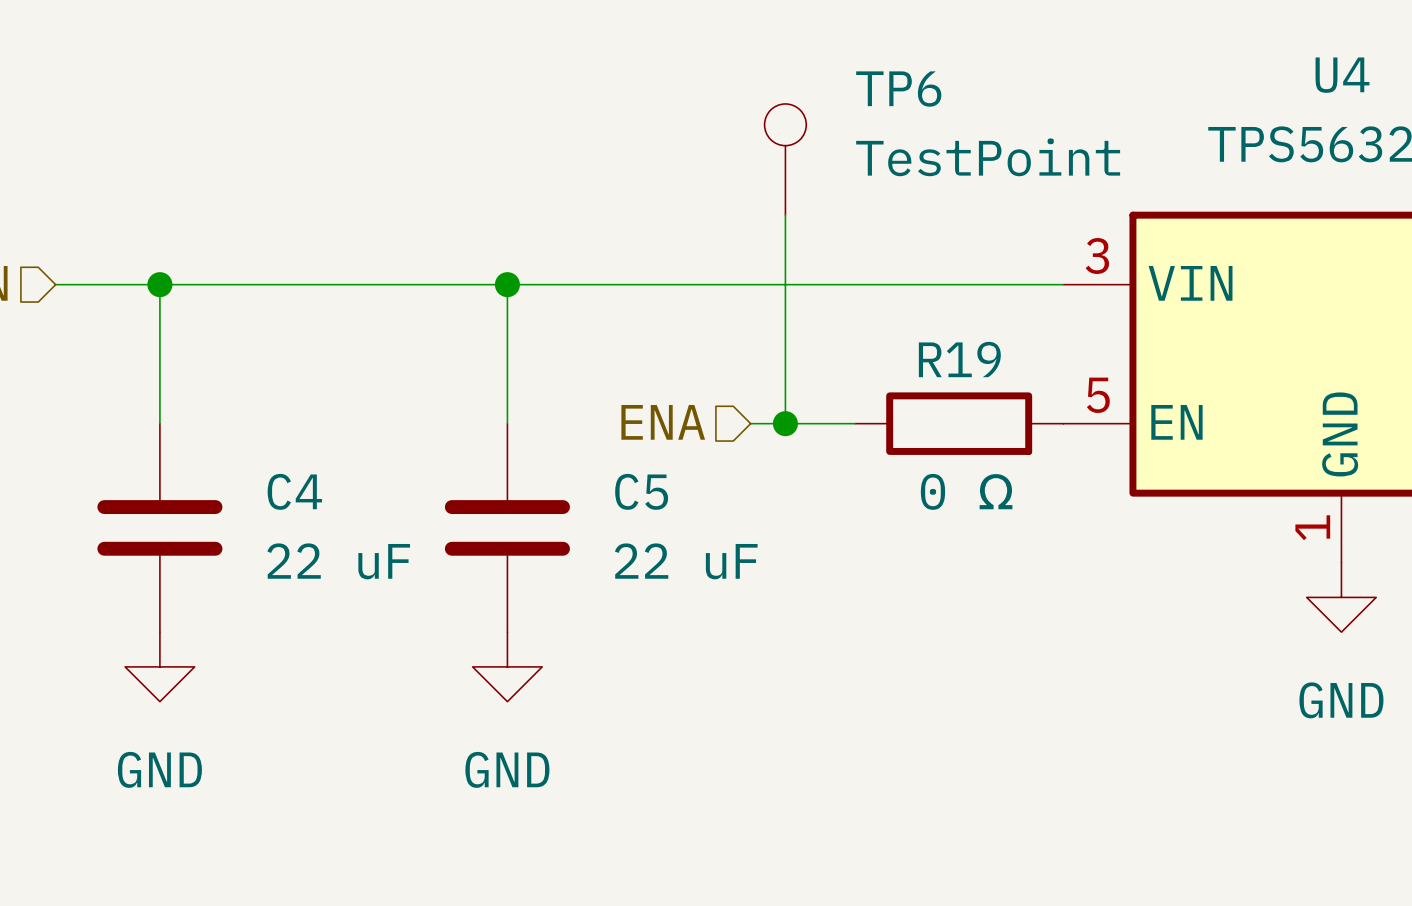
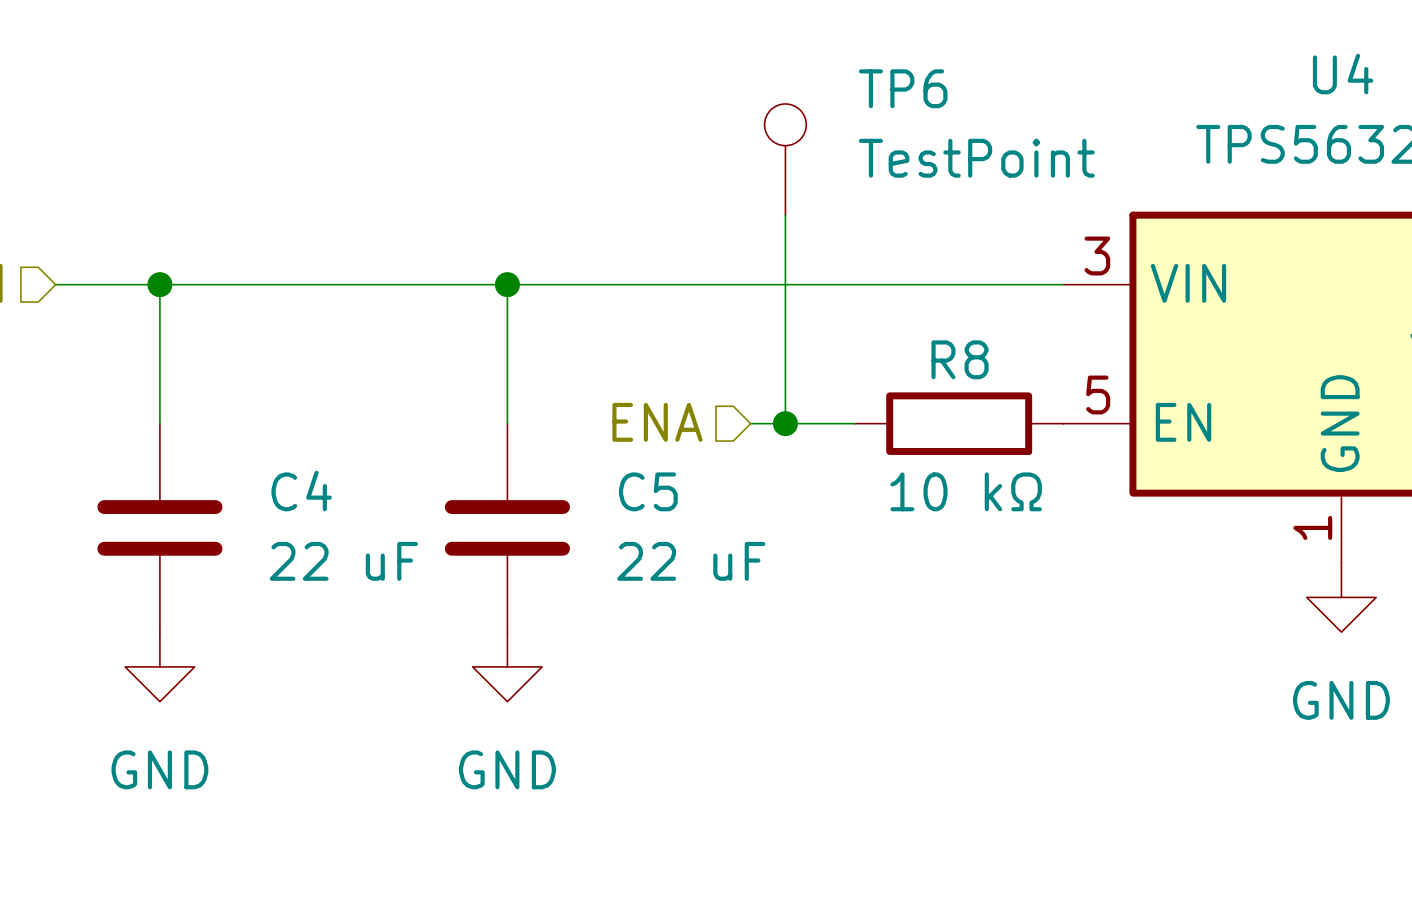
R19 name: R19 (959, 359) -> R8 (960, 359)
R19 value: 0 Ω (966, 491) -> 10 kΩ (966, 491)

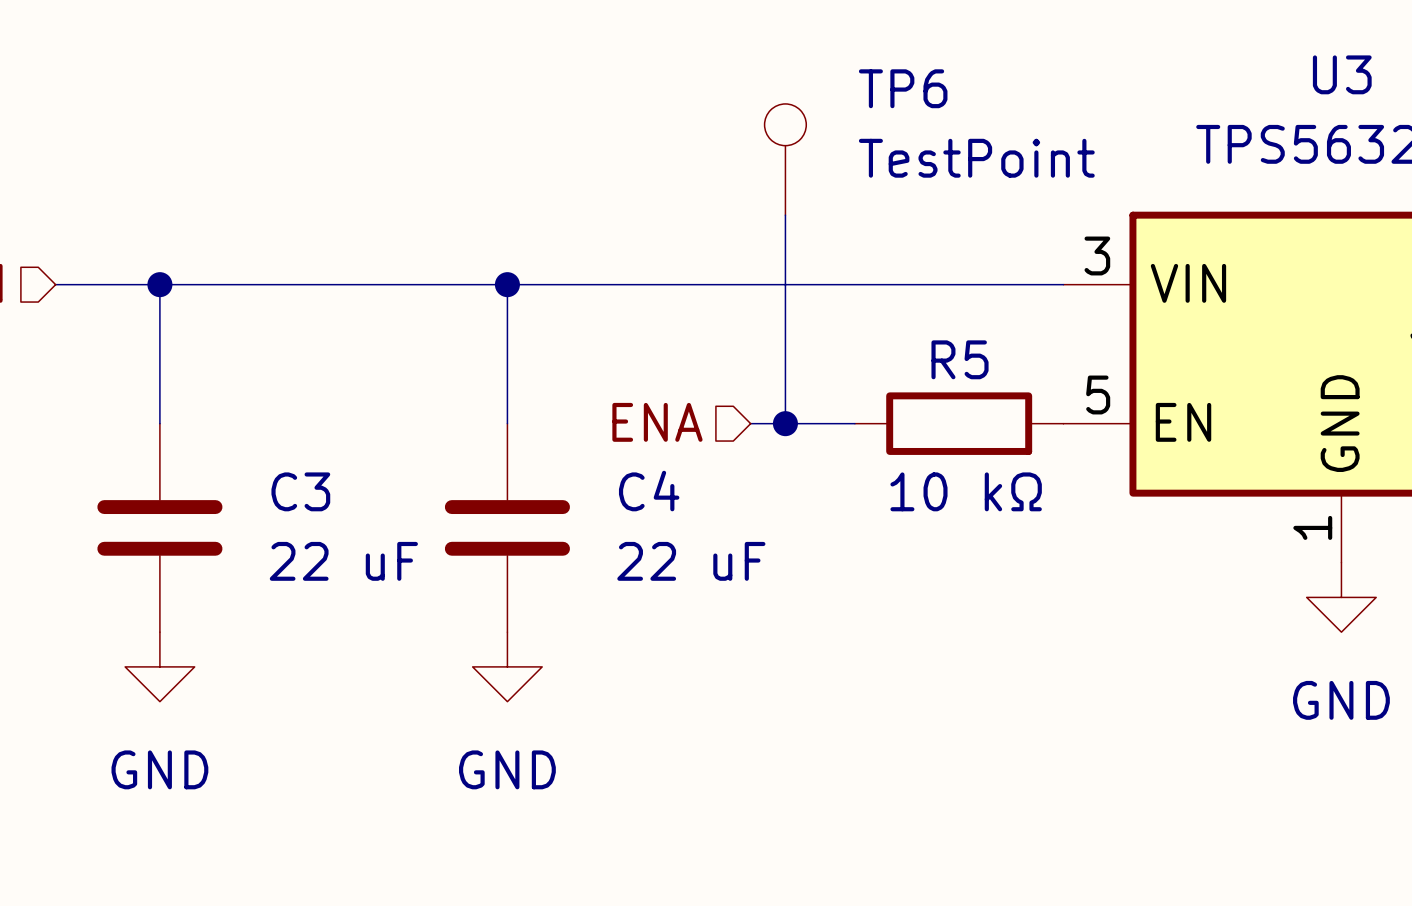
U4 name: U4 (1343, 74) -> U3 (1342, 74)
R8 name: R8 (960, 359) -> R5 (960, 359)
C4 name: C4 (301, 491) -> C3 (300, 491)
C5 name: C5 (648, 491) -> C4 (649, 491)

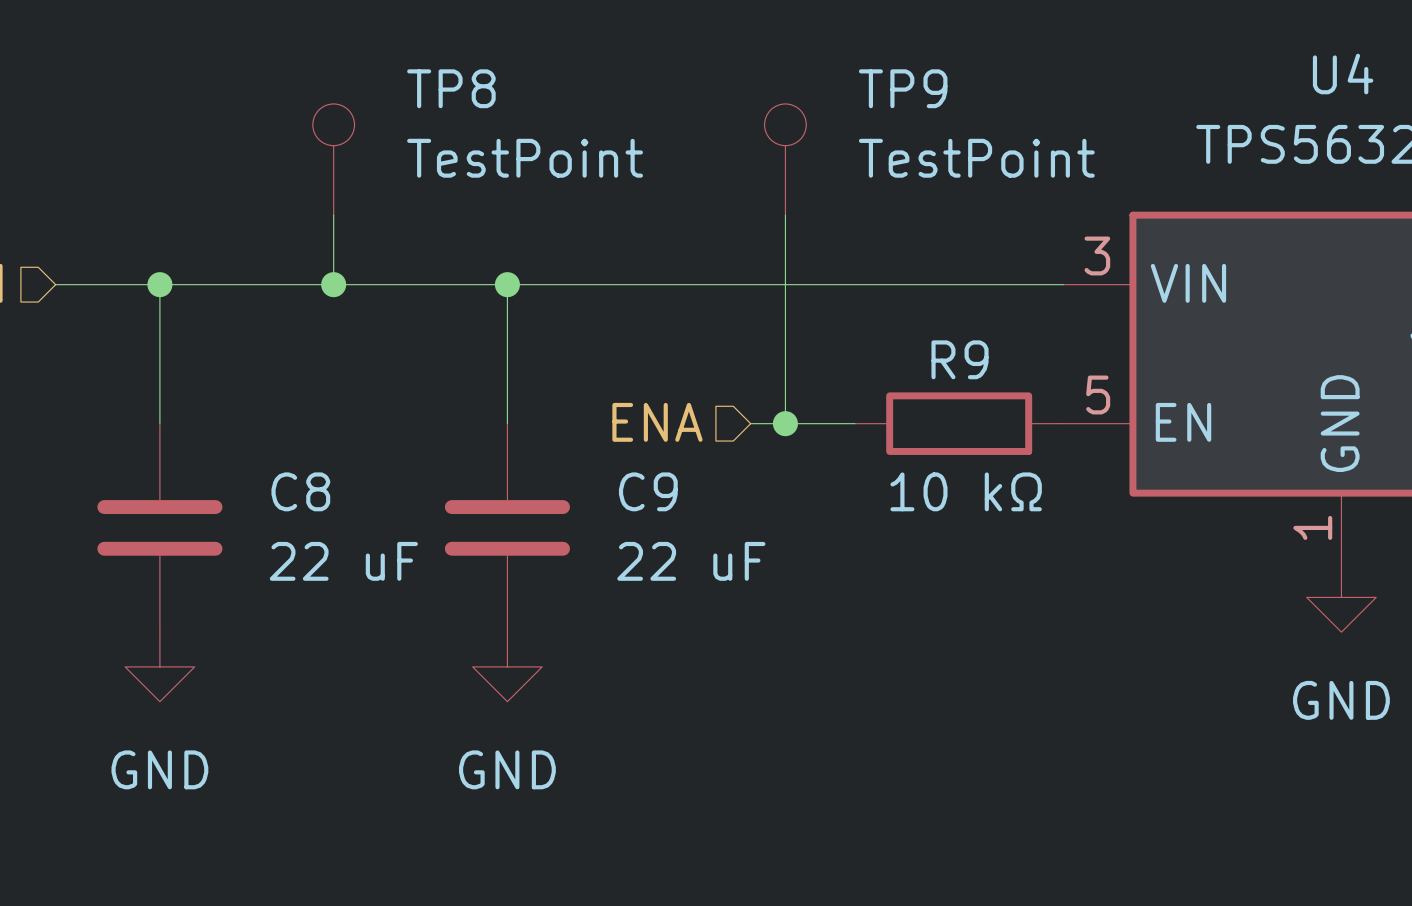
U3 name: U3 (1342, 74) -> U4 (1343, 74)
TP6 name: TP6 (903, 88) -> TP9 (903, 88)
TP8: none -> TestPoint (333, 159)
wire: none -> (333, 215) (333, 284)
junction: none -> (333, 284)
R5 name: R5 (960, 359) -> R9 (960, 359)
C3 name: C3 (300, 491) -> C8 (300, 491)
C4 name: C4 (649, 491) -> C9 (648, 491)

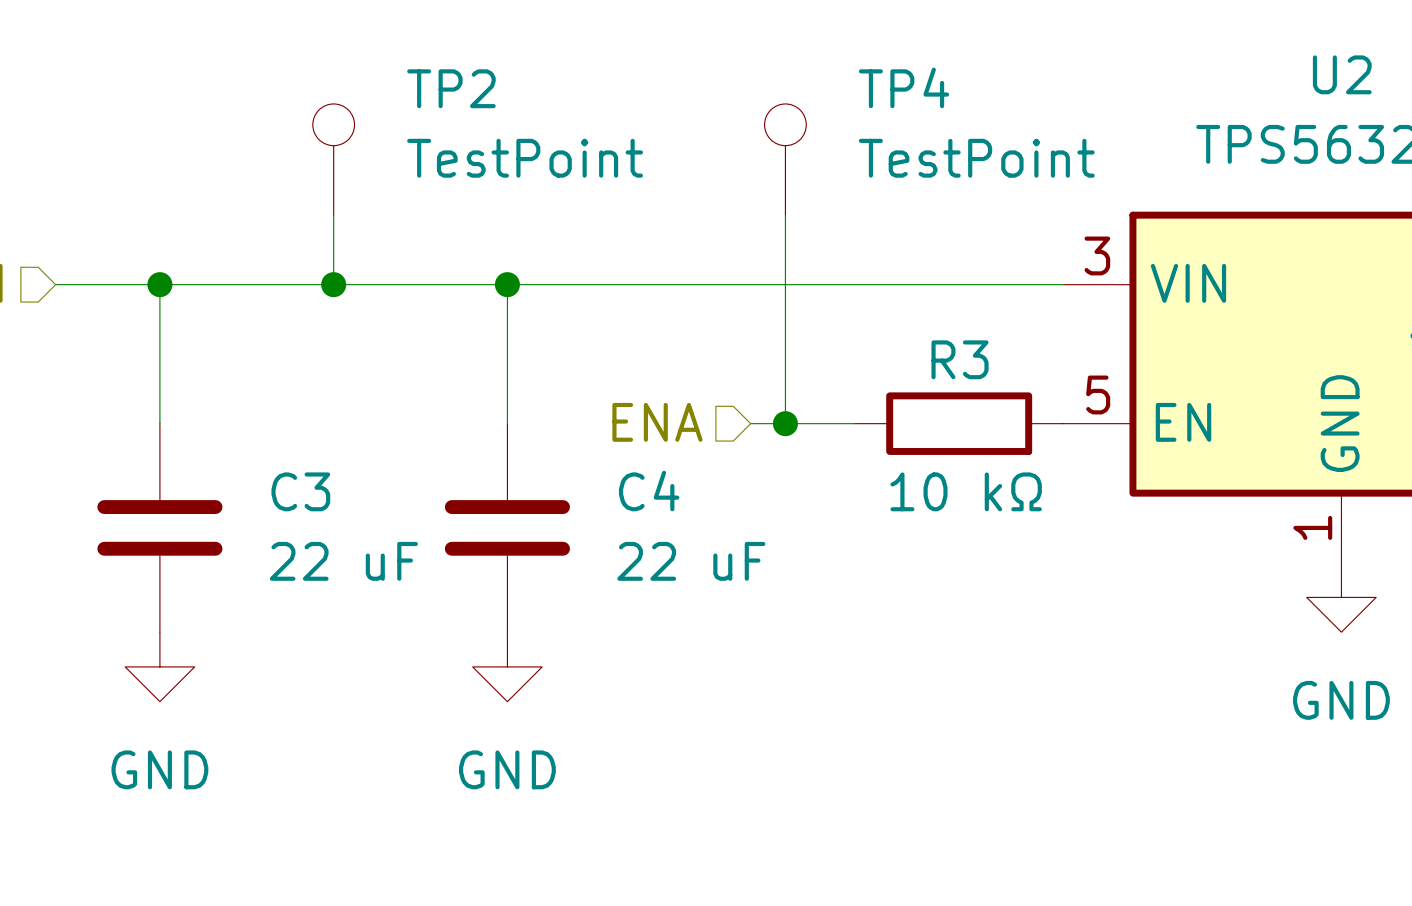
U4 name: U4 (1343, 74) -> U2 (1342, 74)
TP8 name: TP8 (451, 88) -> TP2 (451, 88)
TP9 name: TP9 (903, 88) -> TP4 (904, 87)
R9 name: R9 (960, 359) -> R3 (960, 359)
C8 name: C8 (300, 491) -> C3 (300, 491)
C9 name: C9 (648, 491) -> C4 (649, 491)

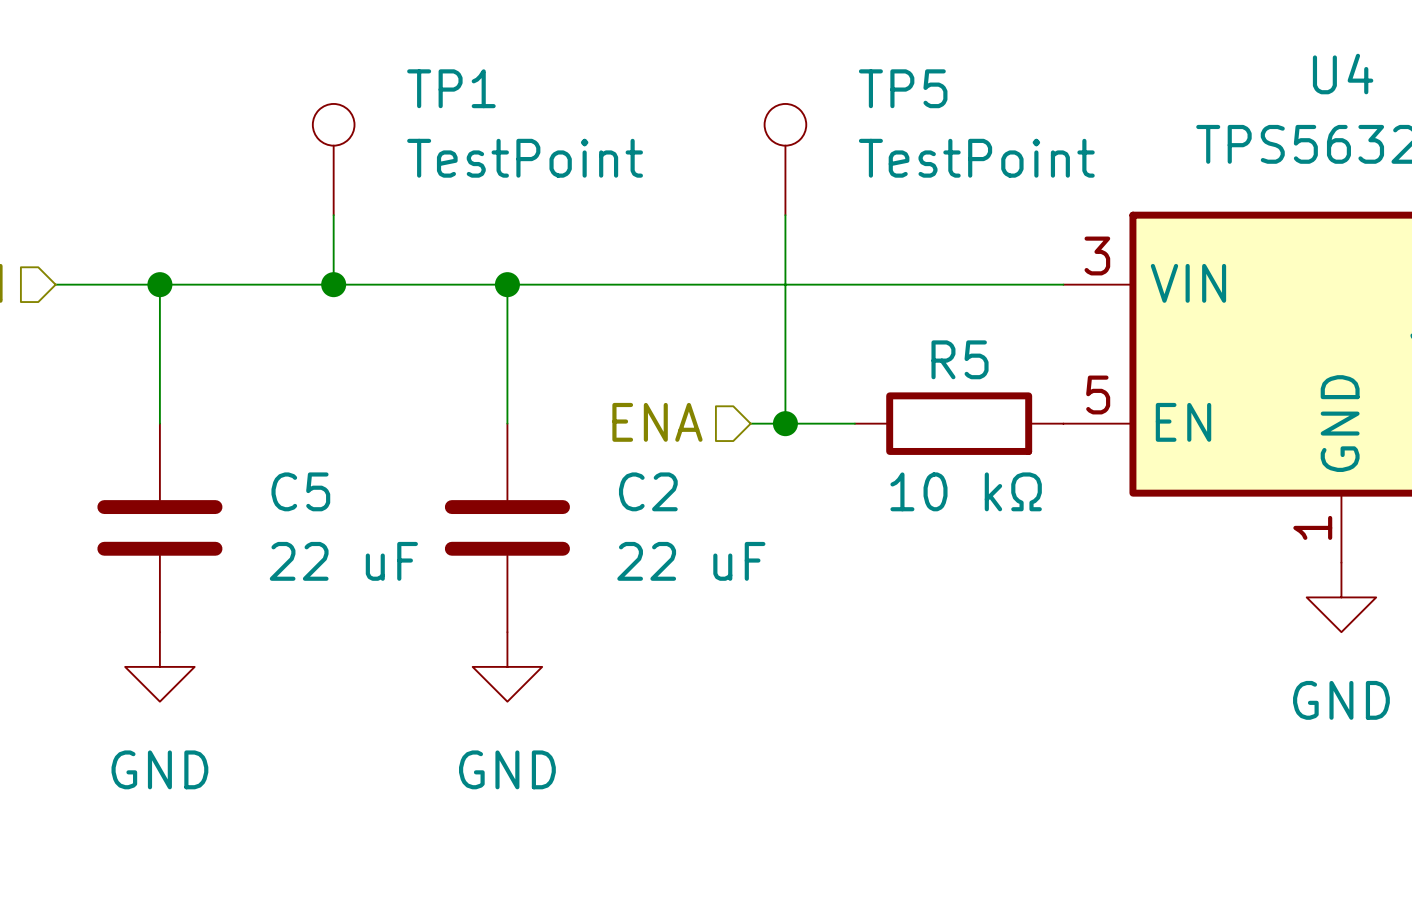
U2 name: U2 (1342, 74) -> U4 (1343, 74)
TP4 name: TP4 (904, 87) -> TP5 (903, 88)
TP2 name: TP2 (451, 88) -> TP1 (451, 88)
R3 name: R3 (960, 359) -> R5 (960, 359)
C3 name: C3 (300, 491) -> C5 (300, 491)
C4 name: C4 (649, 491) -> C2 (648, 491)

